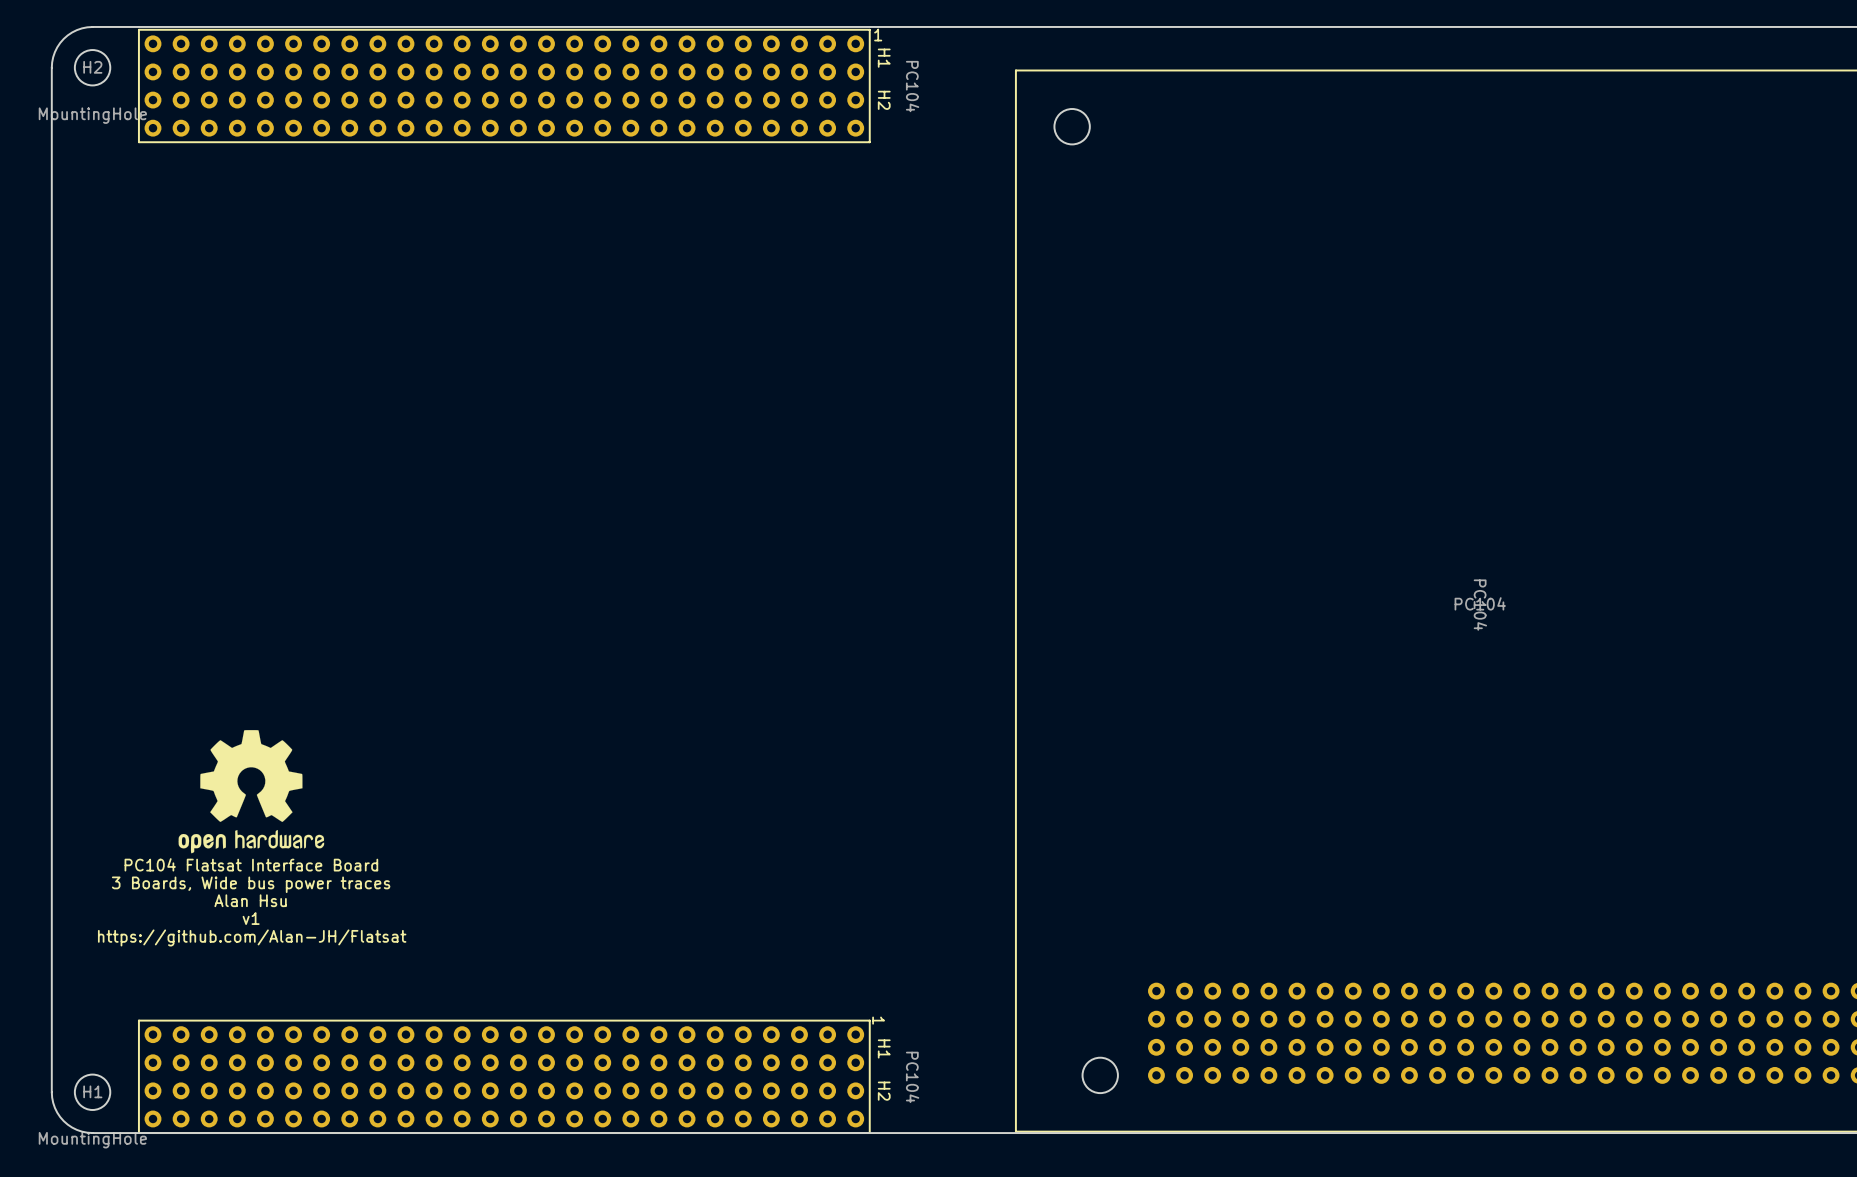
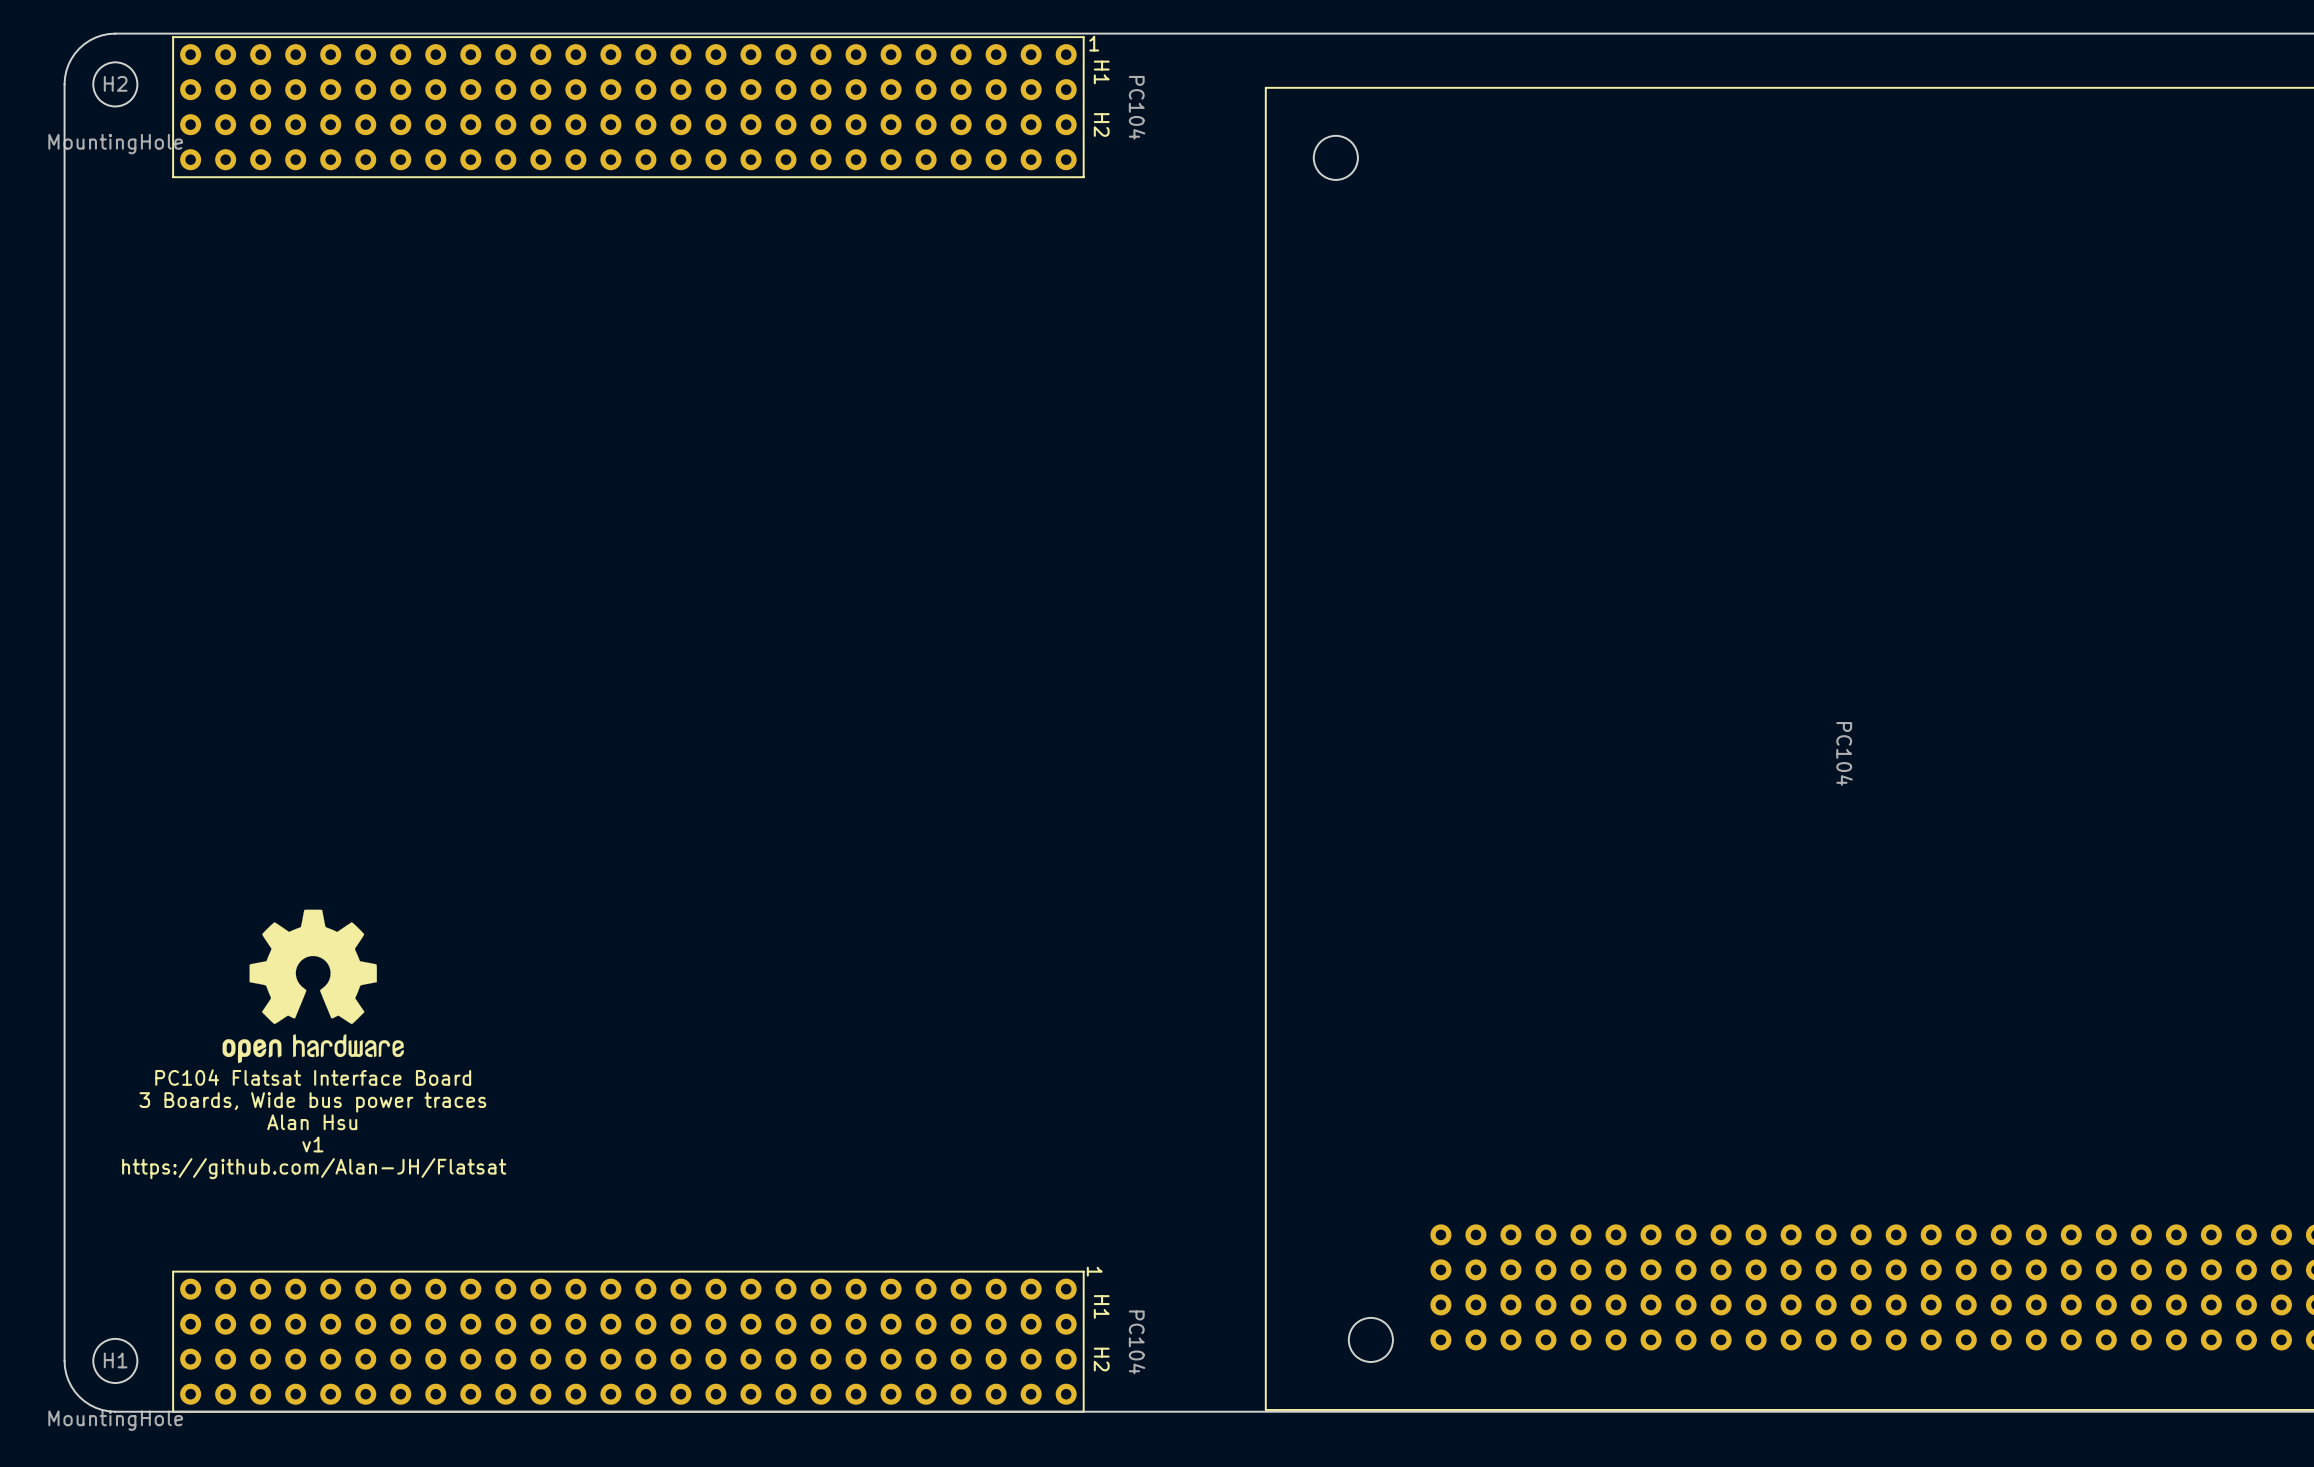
text: PC104 (1480, 603) -> none

